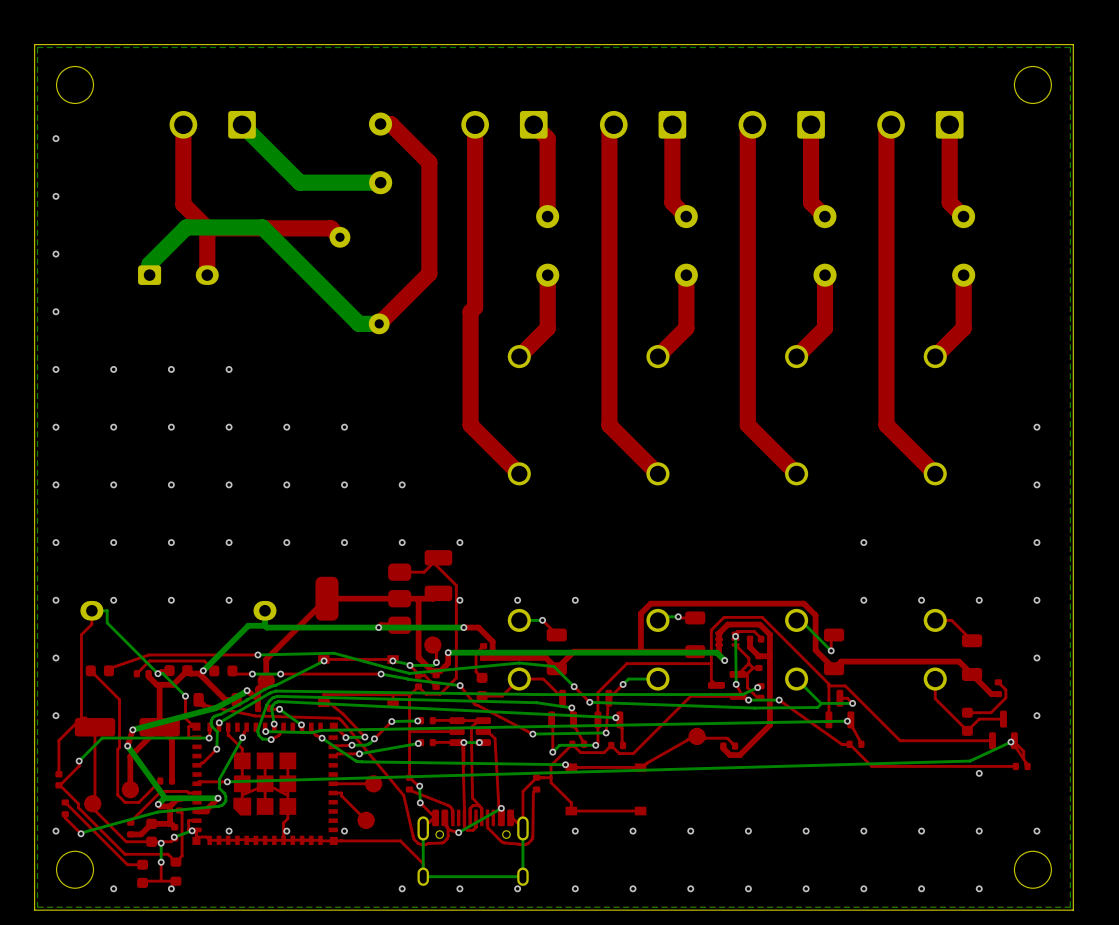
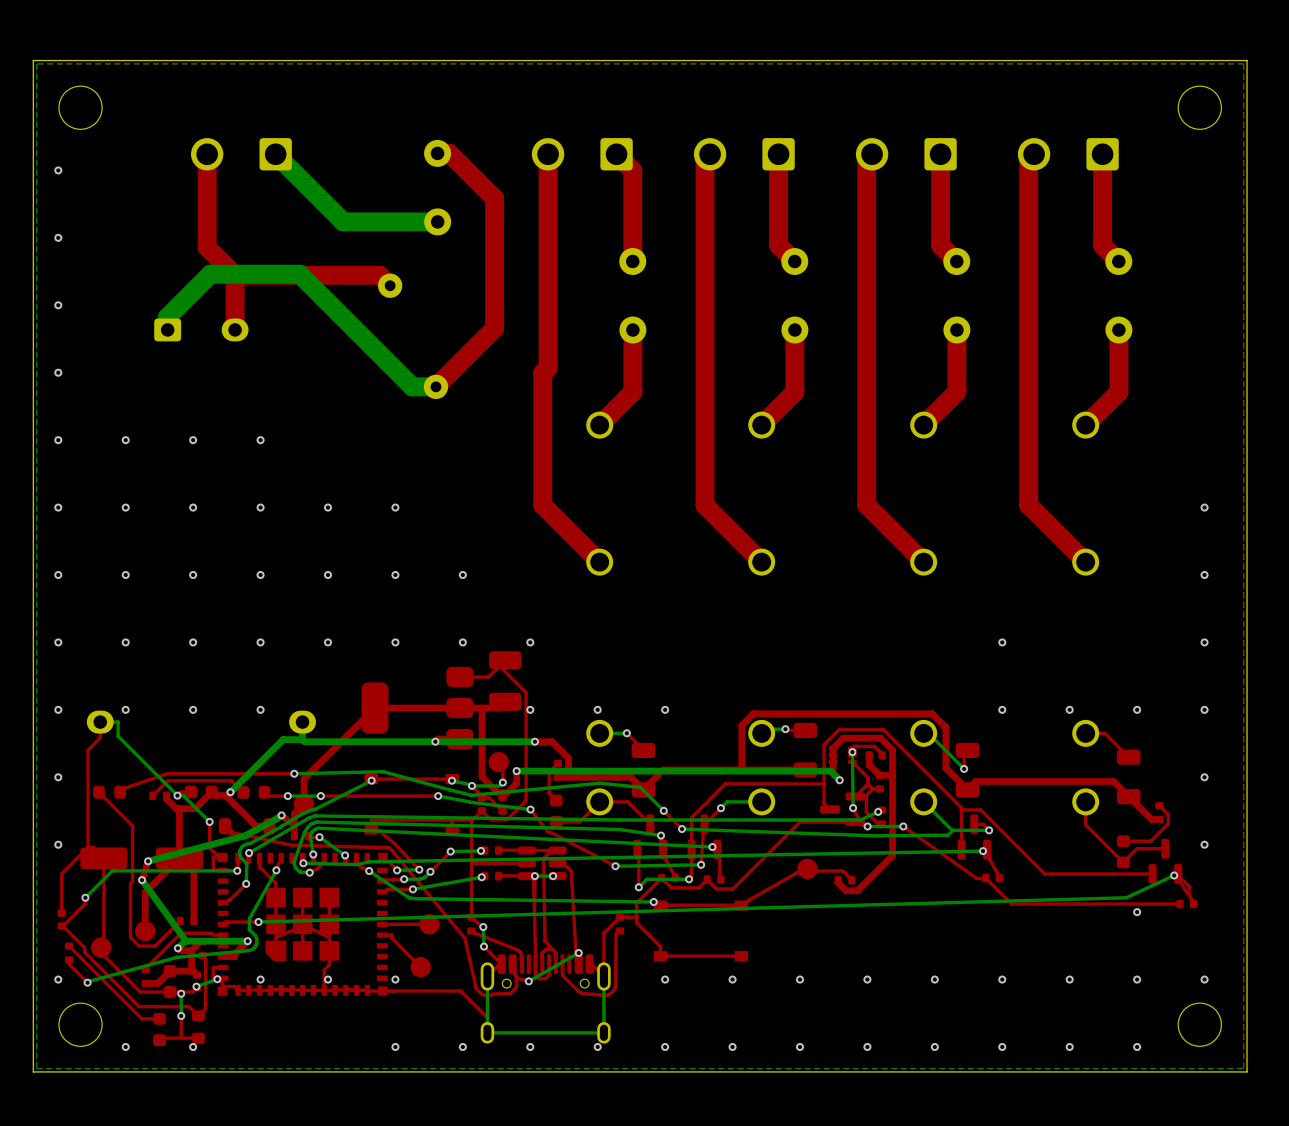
via: none -> (395, 1046)

